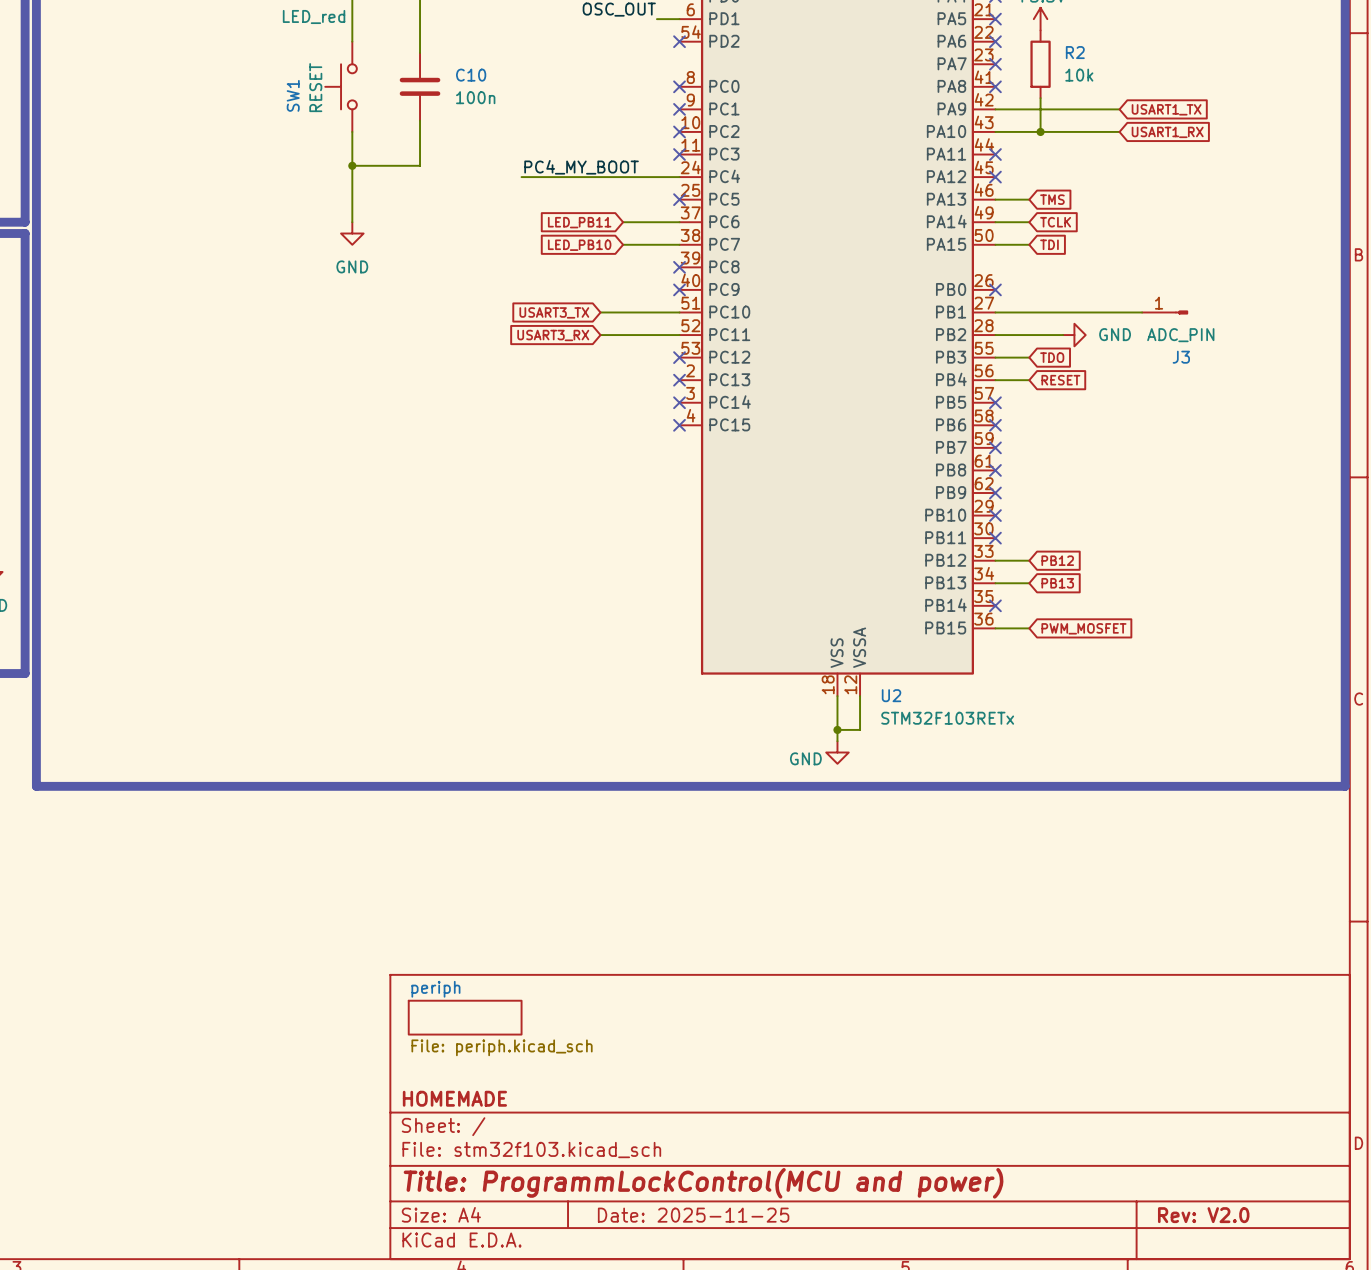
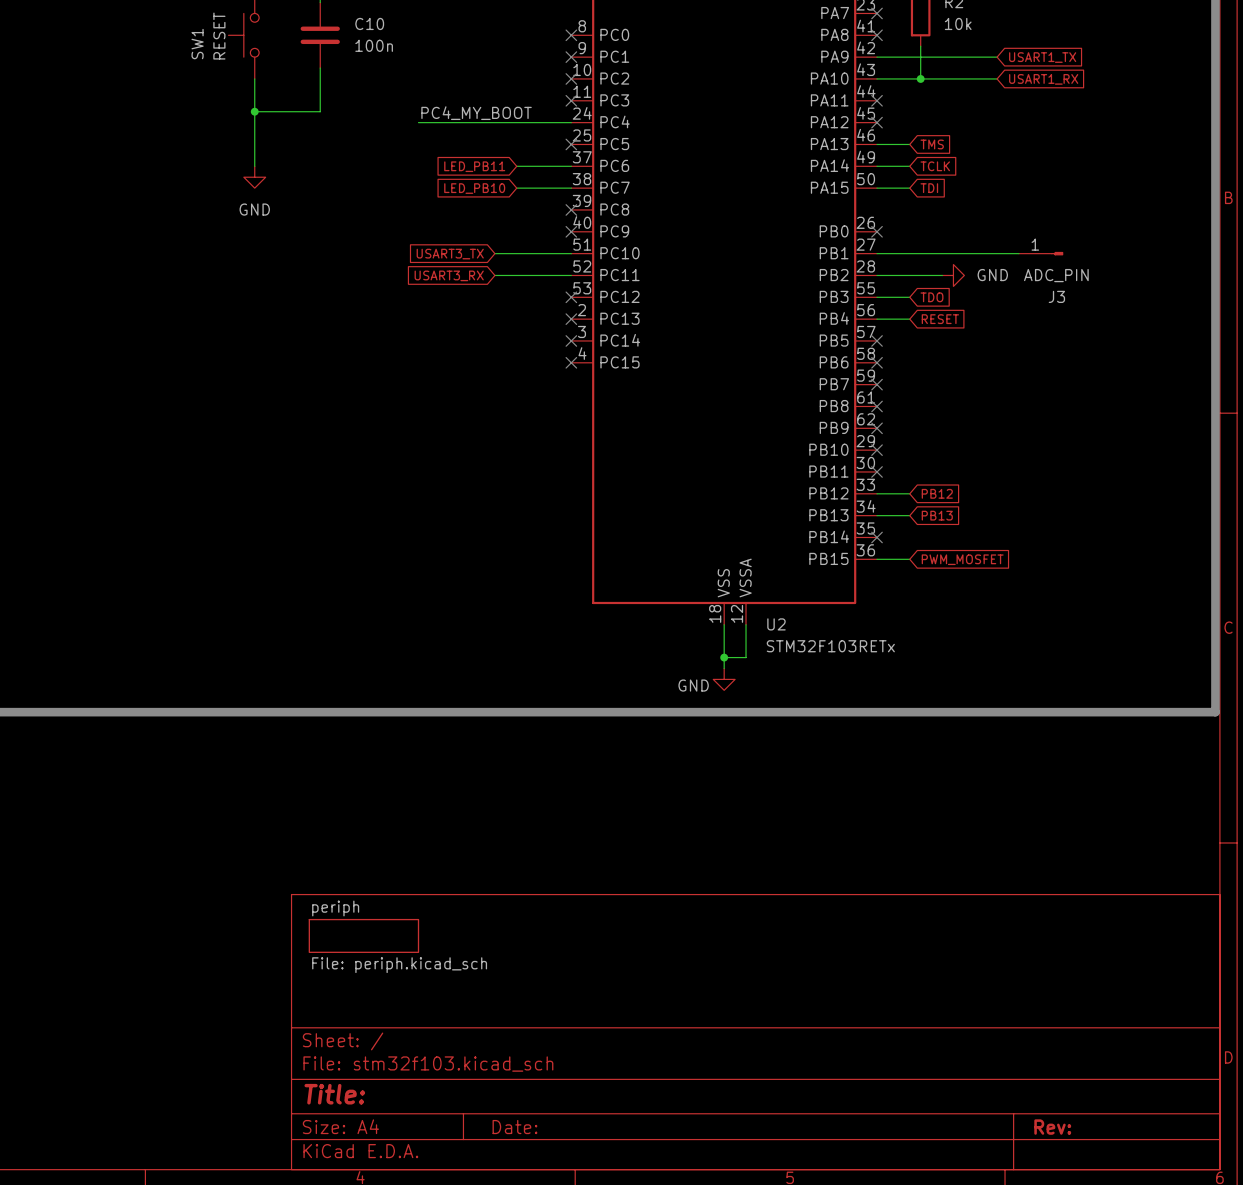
title block: HOMEMADE (454, 1098) -> none
title block: Title: ProgrammLockControl(MCU and power) (703, 1183) -> Title: (334, 1094)
title block: Date: 2025-11-25 (693, 1215) -> Date: (514, 1127)
title block: Rev: V2.0 (1203, 1215) -> Rev: (1052, 1127)

